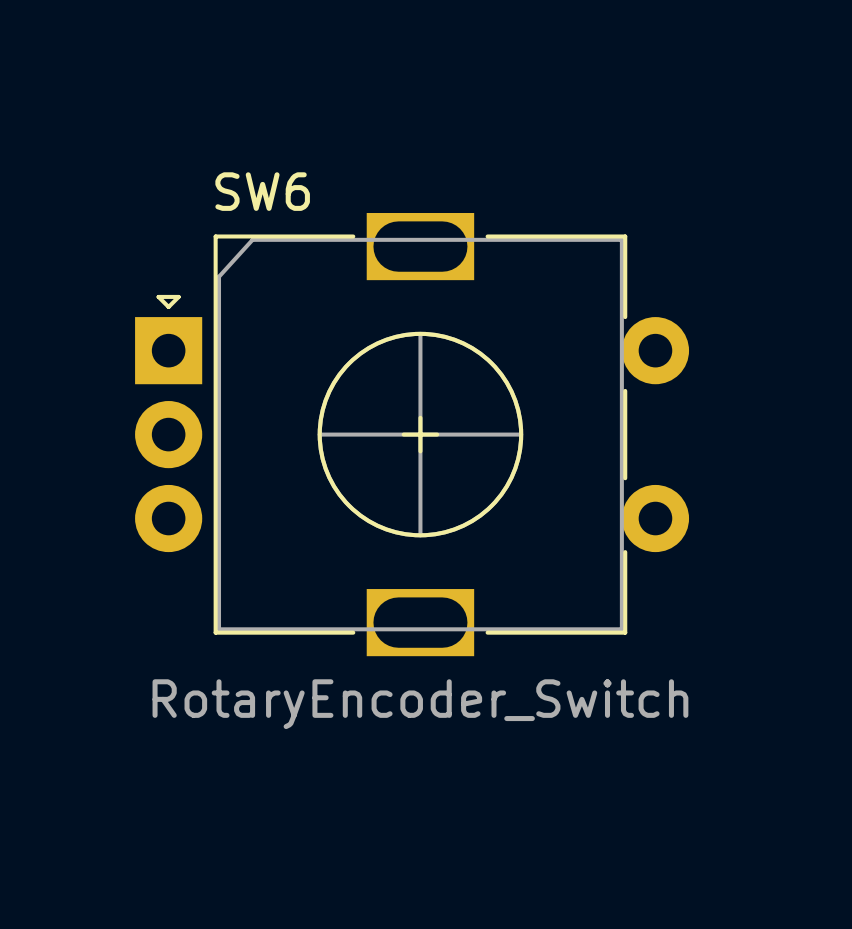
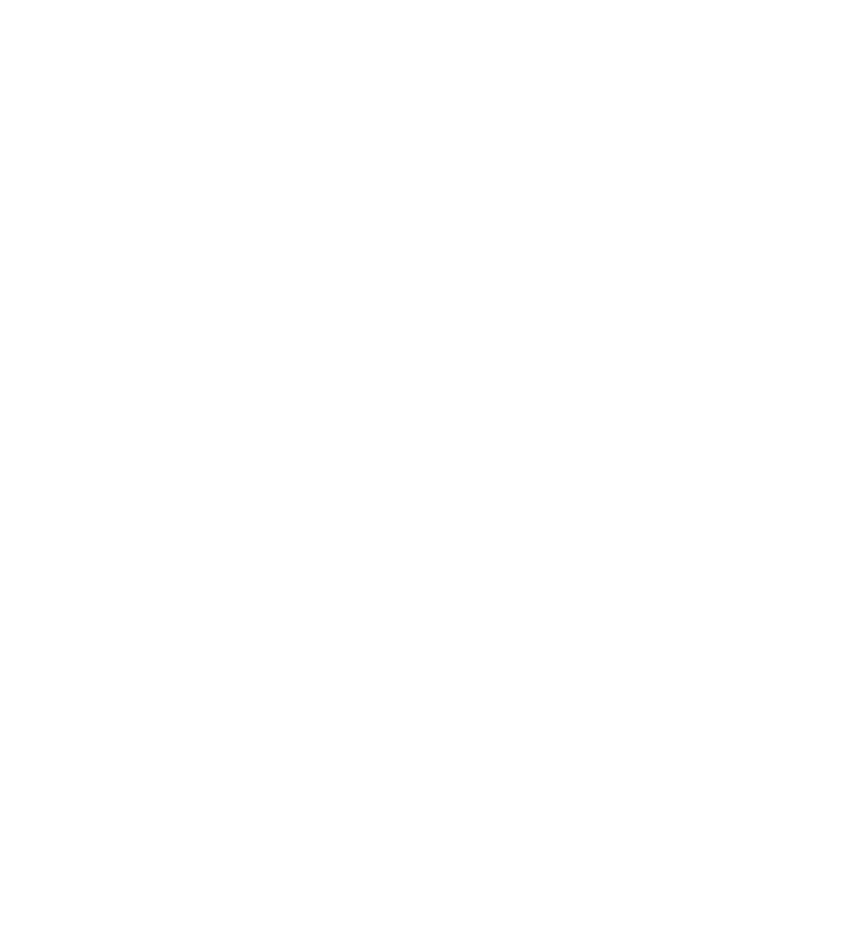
SW6: RotaryEncoder_Switch (412, 434) -> none

